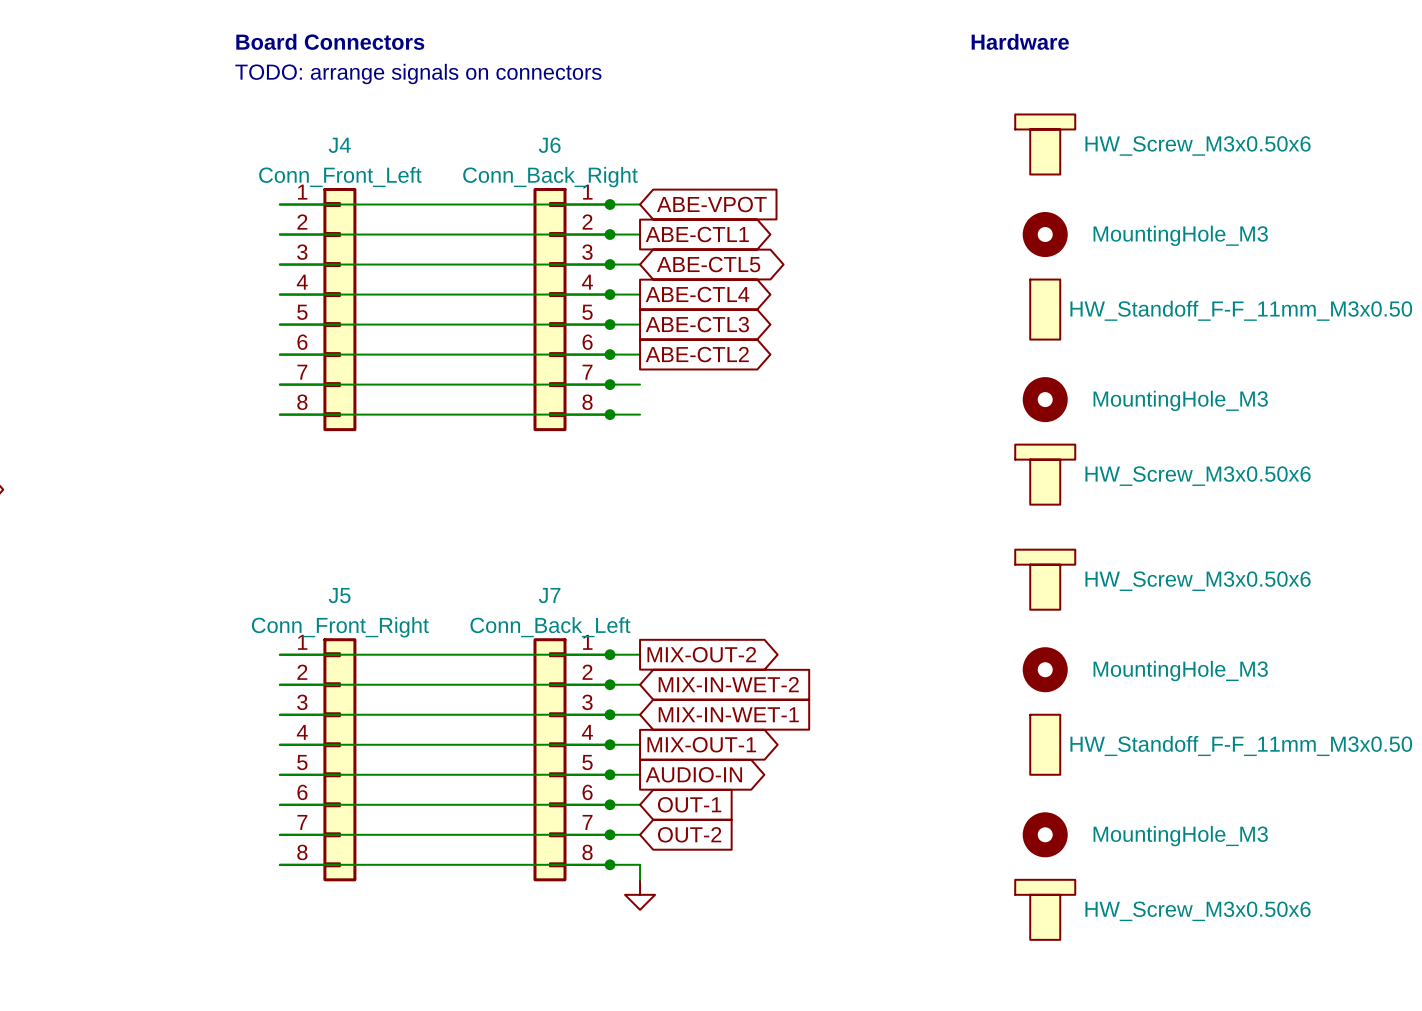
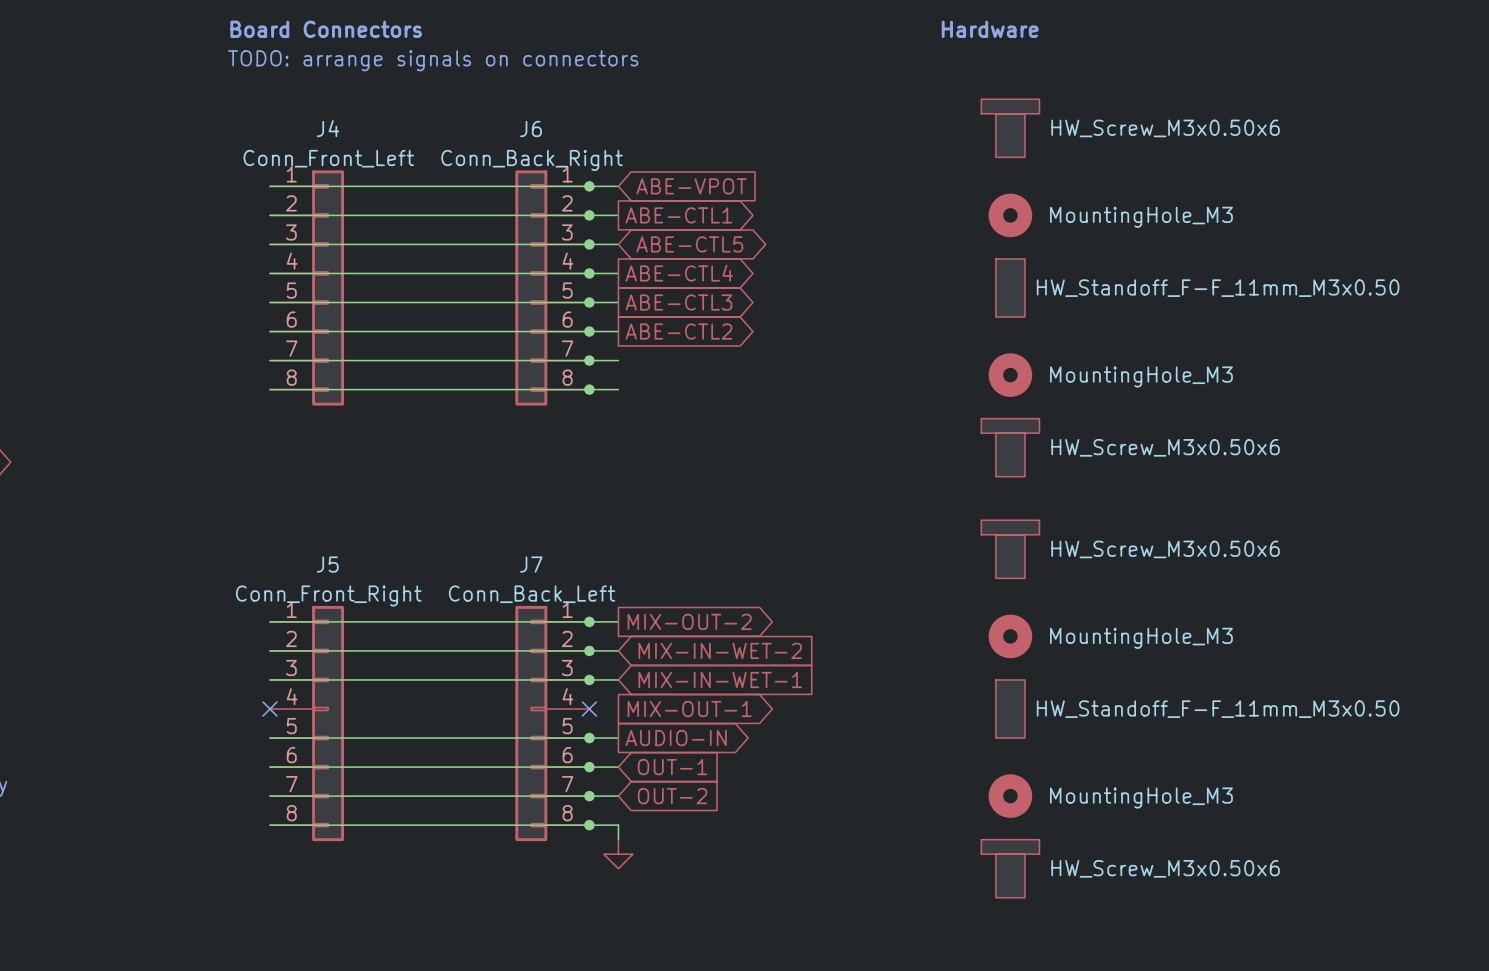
wire: (279, 744) (640, 744) -> none
no-connect mark: none -> (270, 709)
junction: (610, 744) -> none
no-connect mark: none -> (589, 709)

